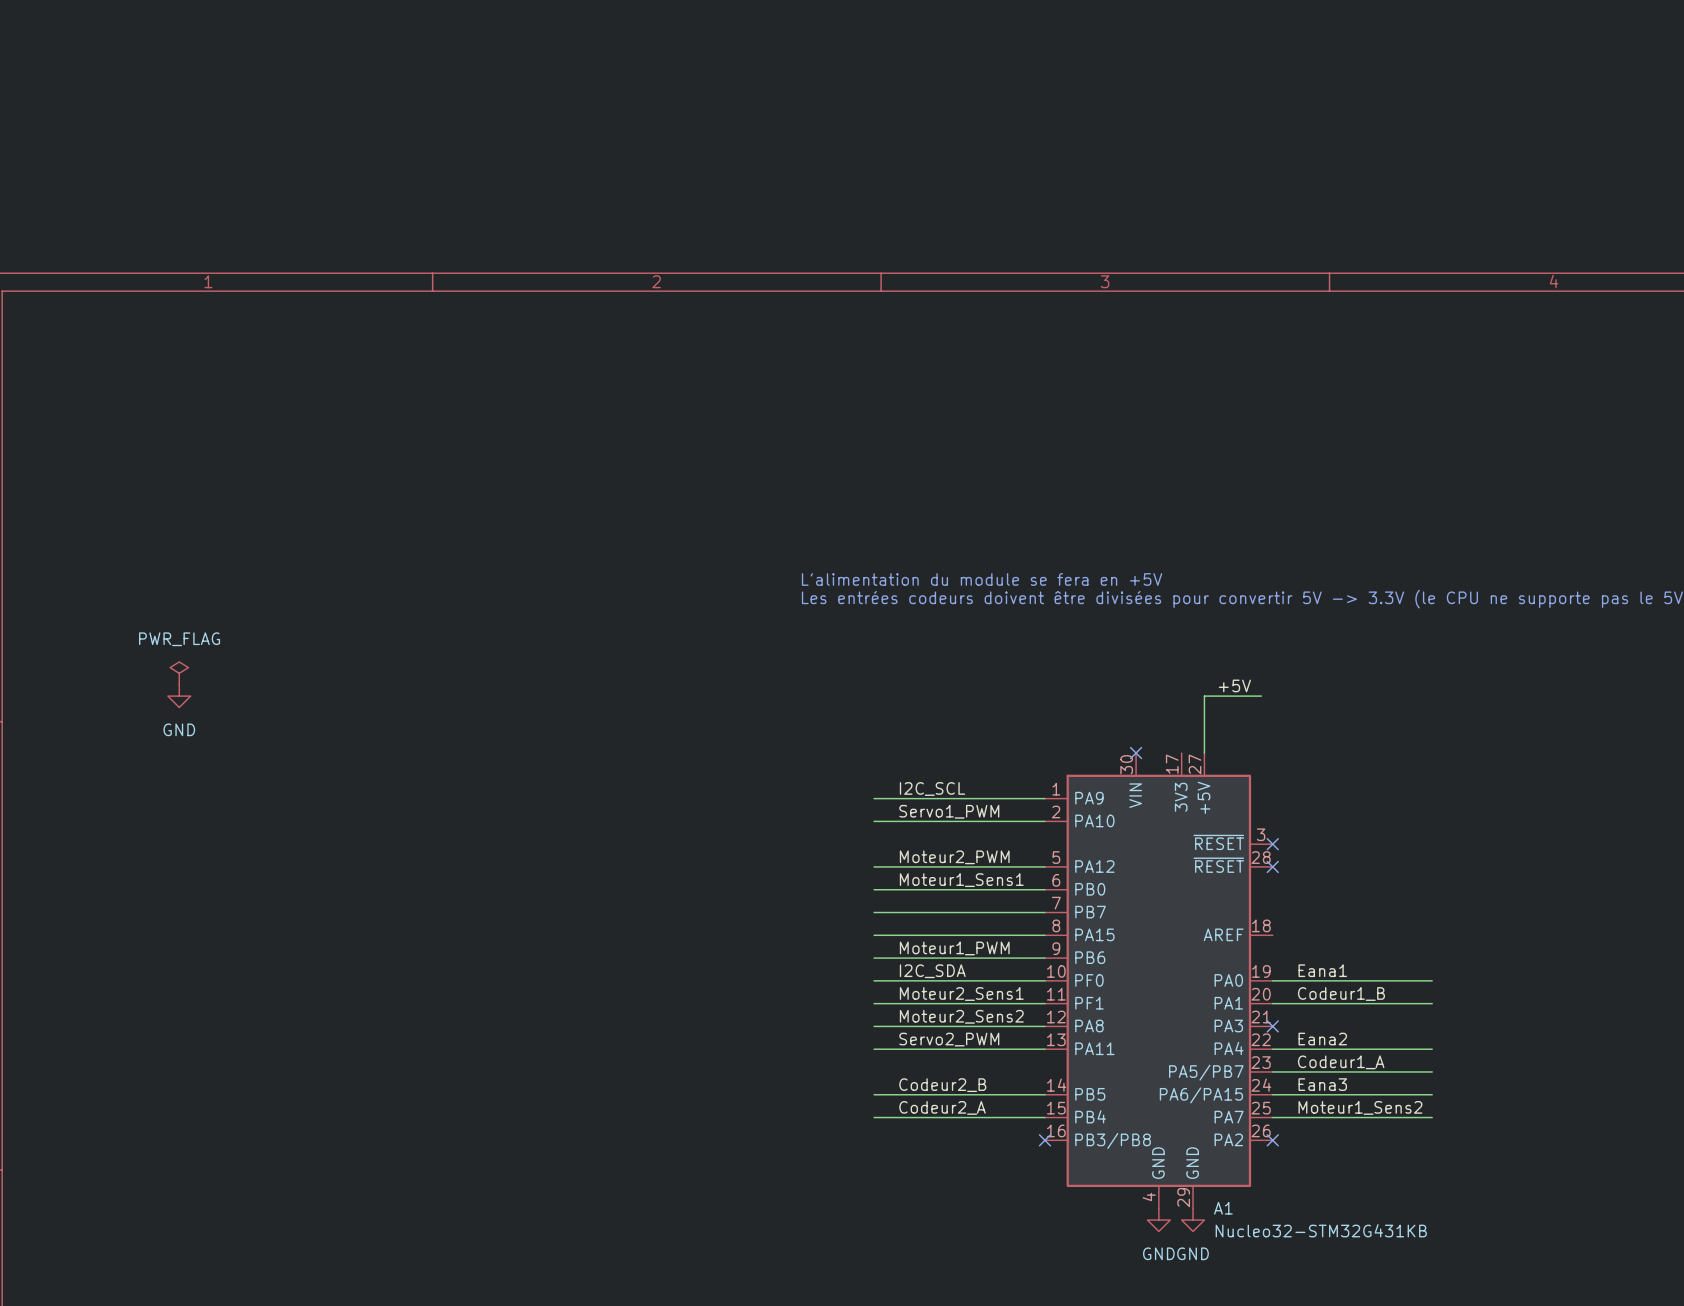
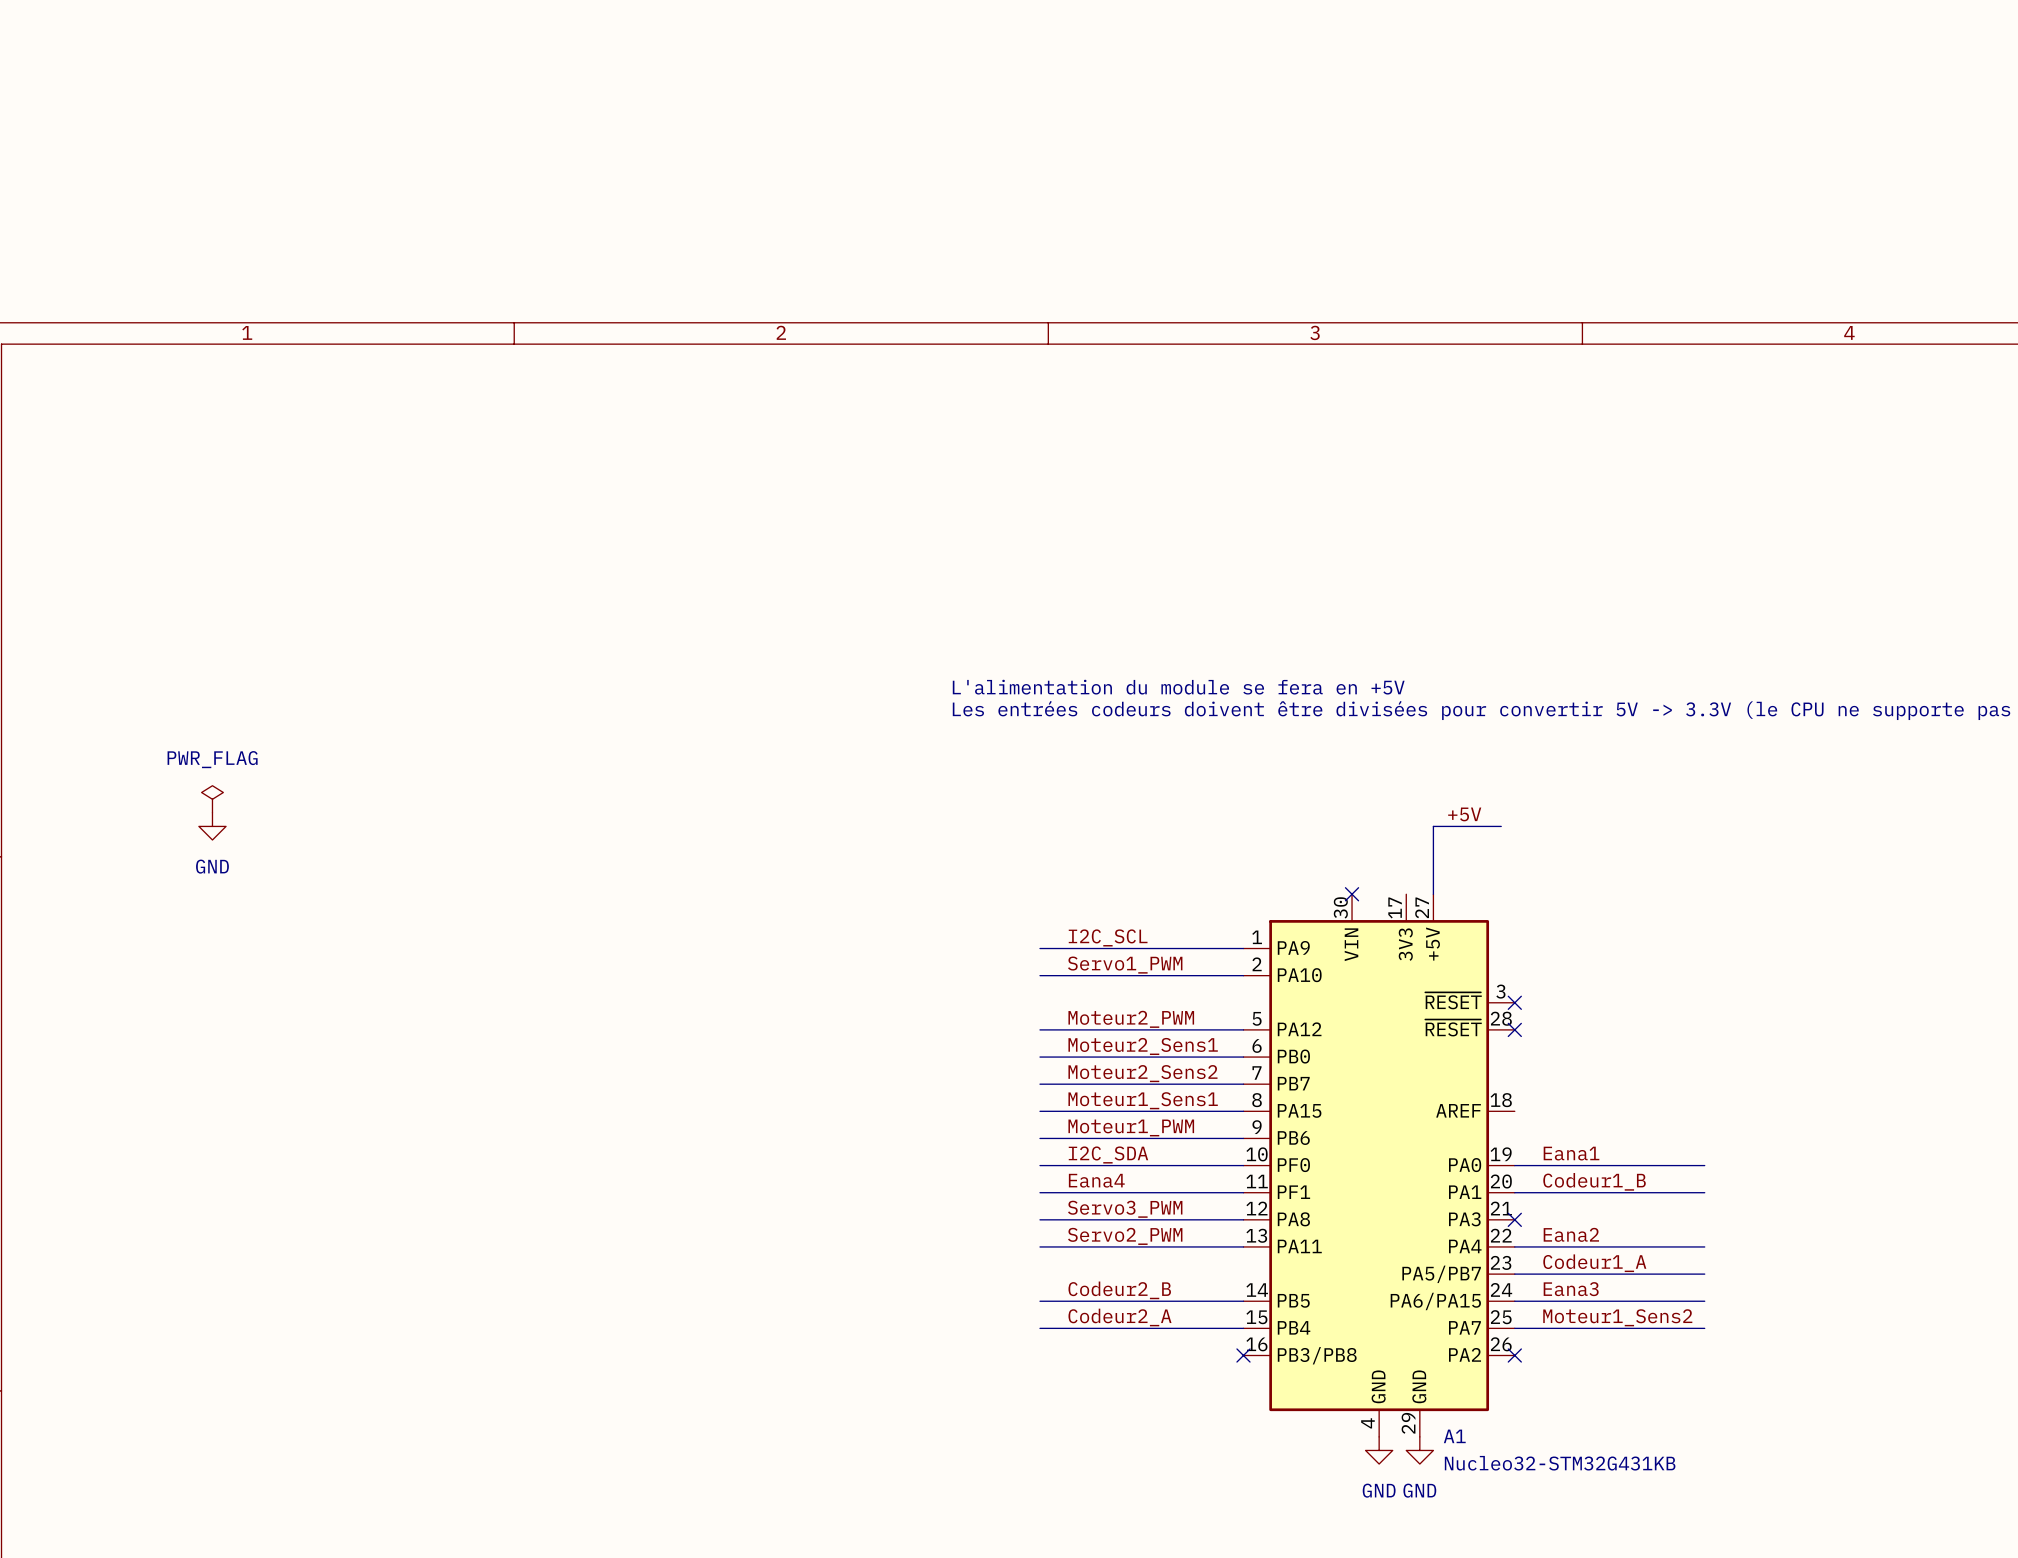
label: Moteur1_Sens1 (961, 880) -> Moteur2_Sens1 (1143, 1046)
label: none -> Moteur2_Sens2 (1142, 1073)
label: none -> Moteur1_Sens1 (1143, 1100)
label: Moteur2_Sens1 (961, 994) -> Eana4 (1096, 1180)
label: Moteur2_Sens2 (961, 1016) -> Servo3_PWM (1125, 1209)

